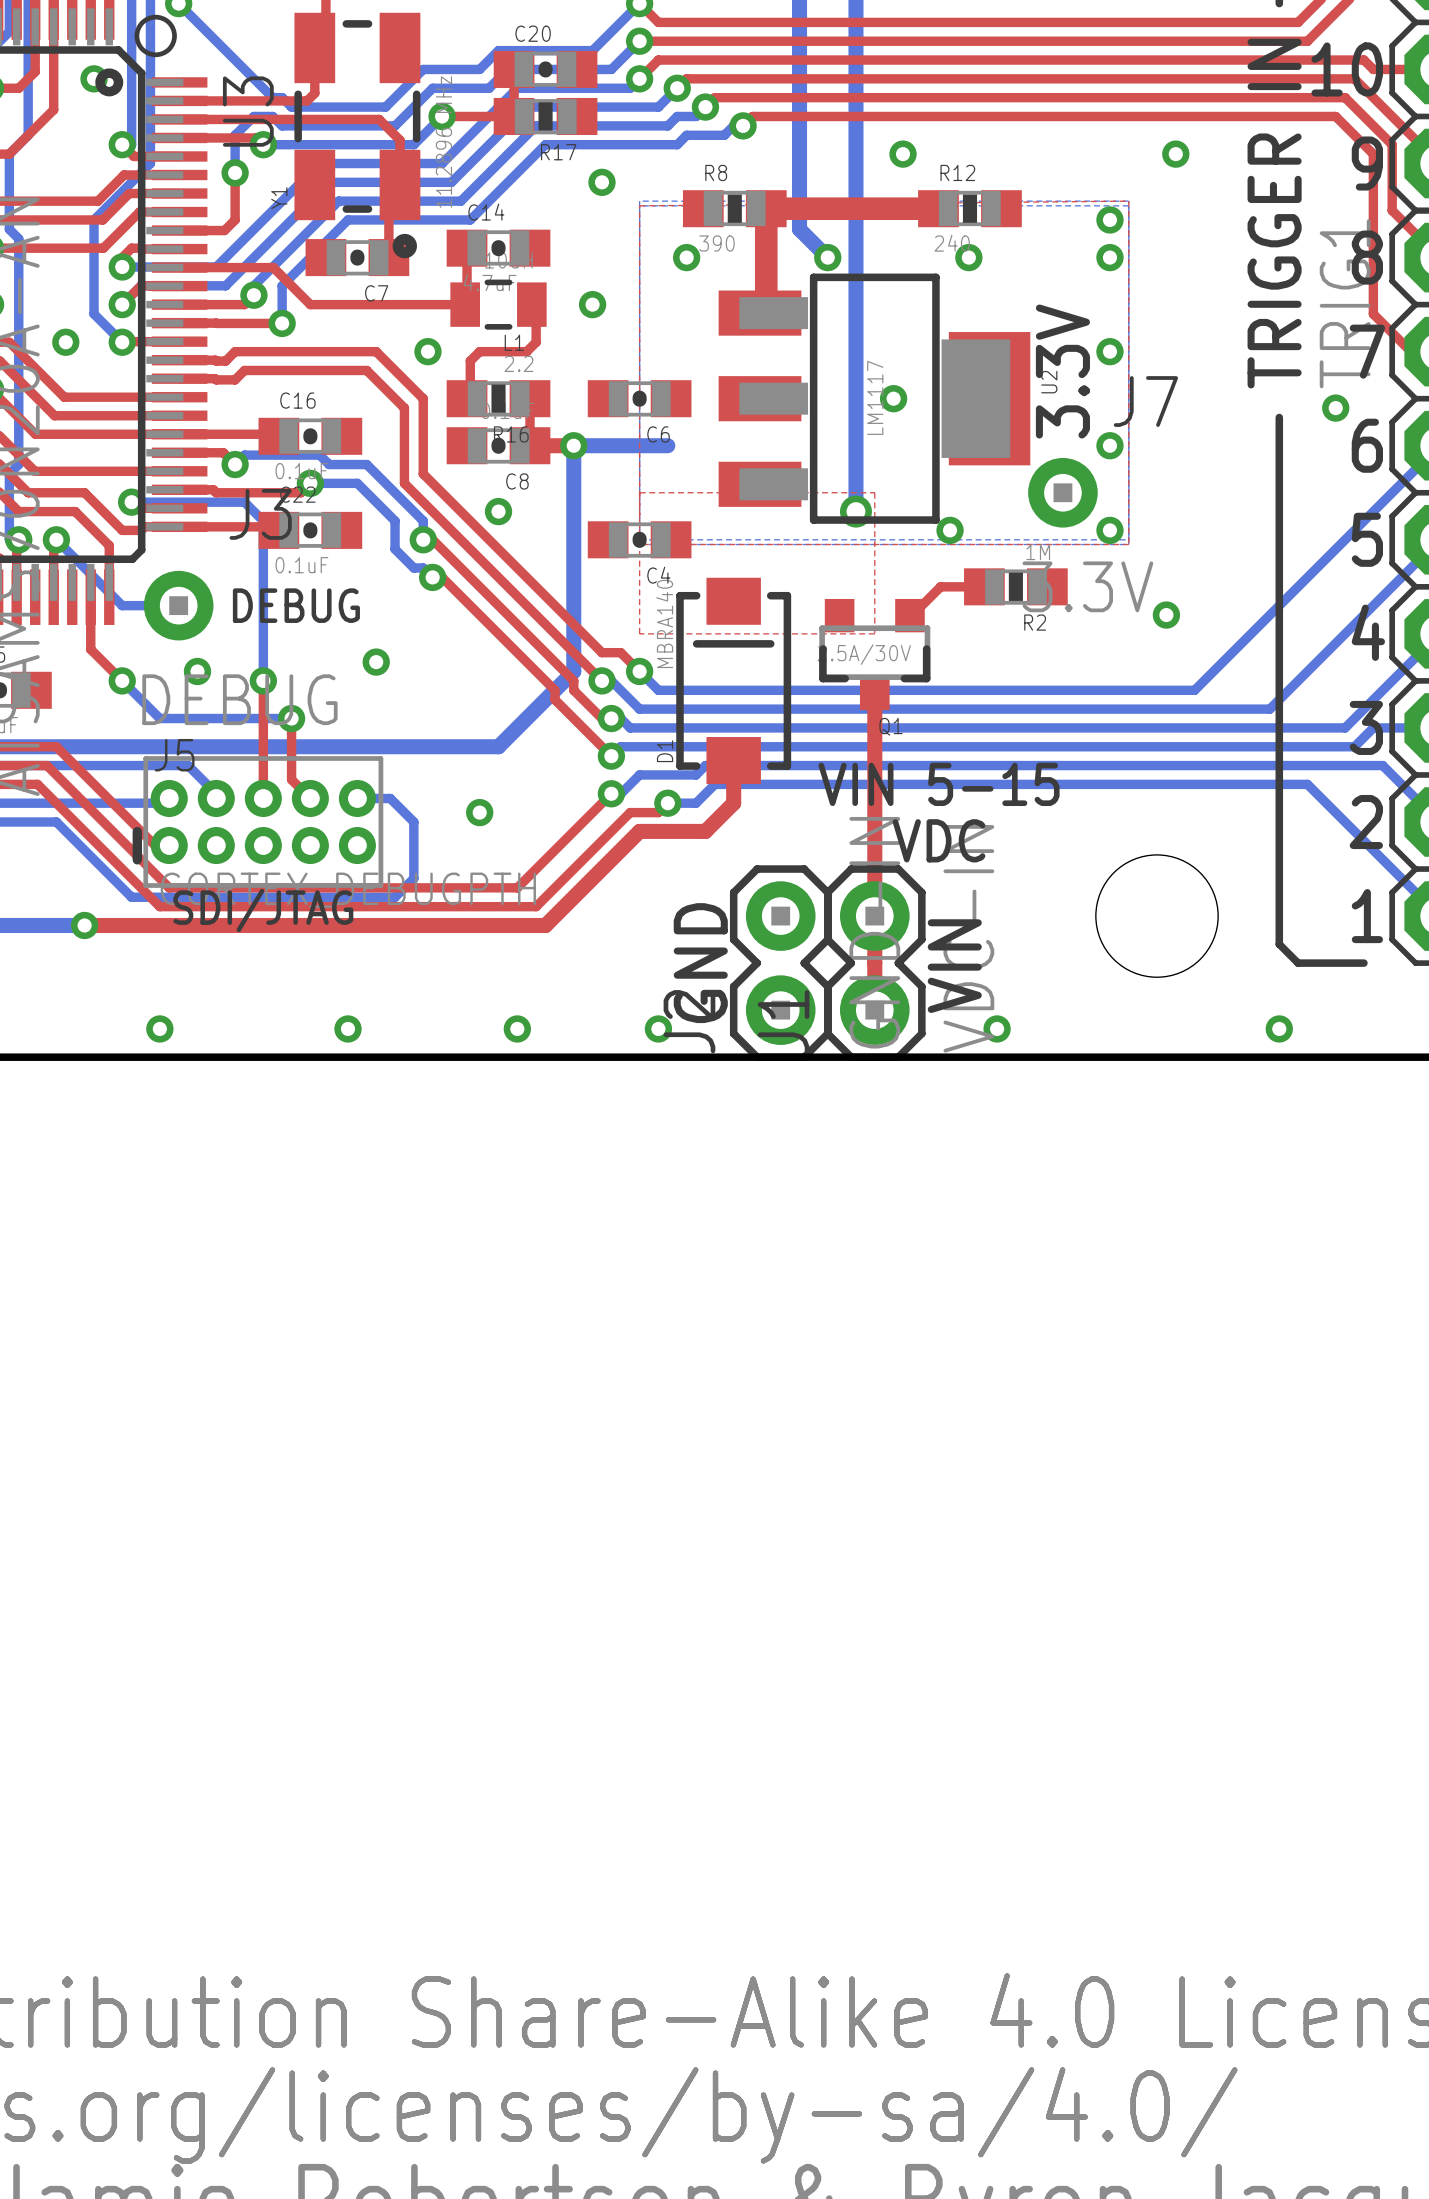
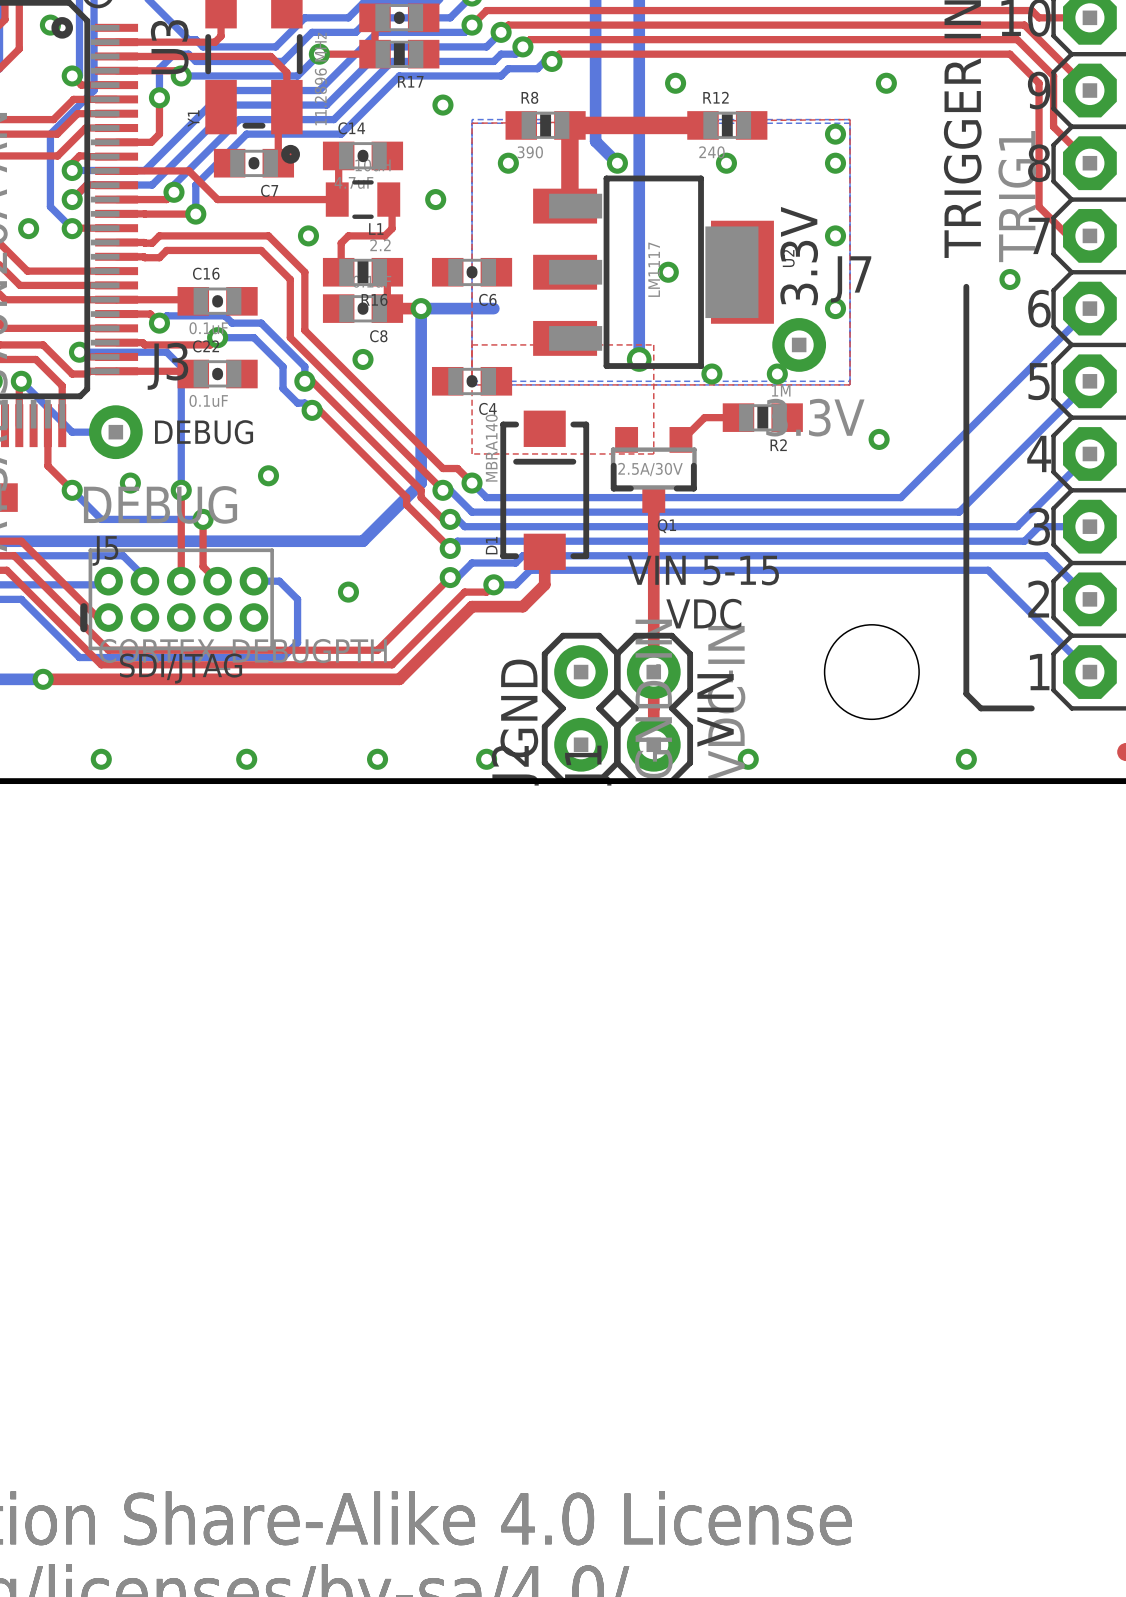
via position: (1109, 530) -> (777, 374)

